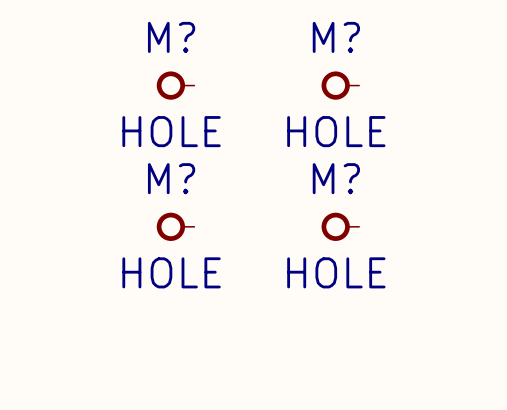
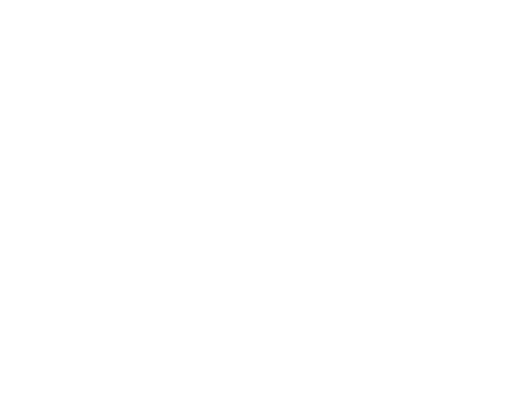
M?: HOLE (175, 85) -> none
M?: HOLE (340, 85) -> none
M?: HOLE (175, 226) -> none
M?: HOLE (340, 226) -> none

